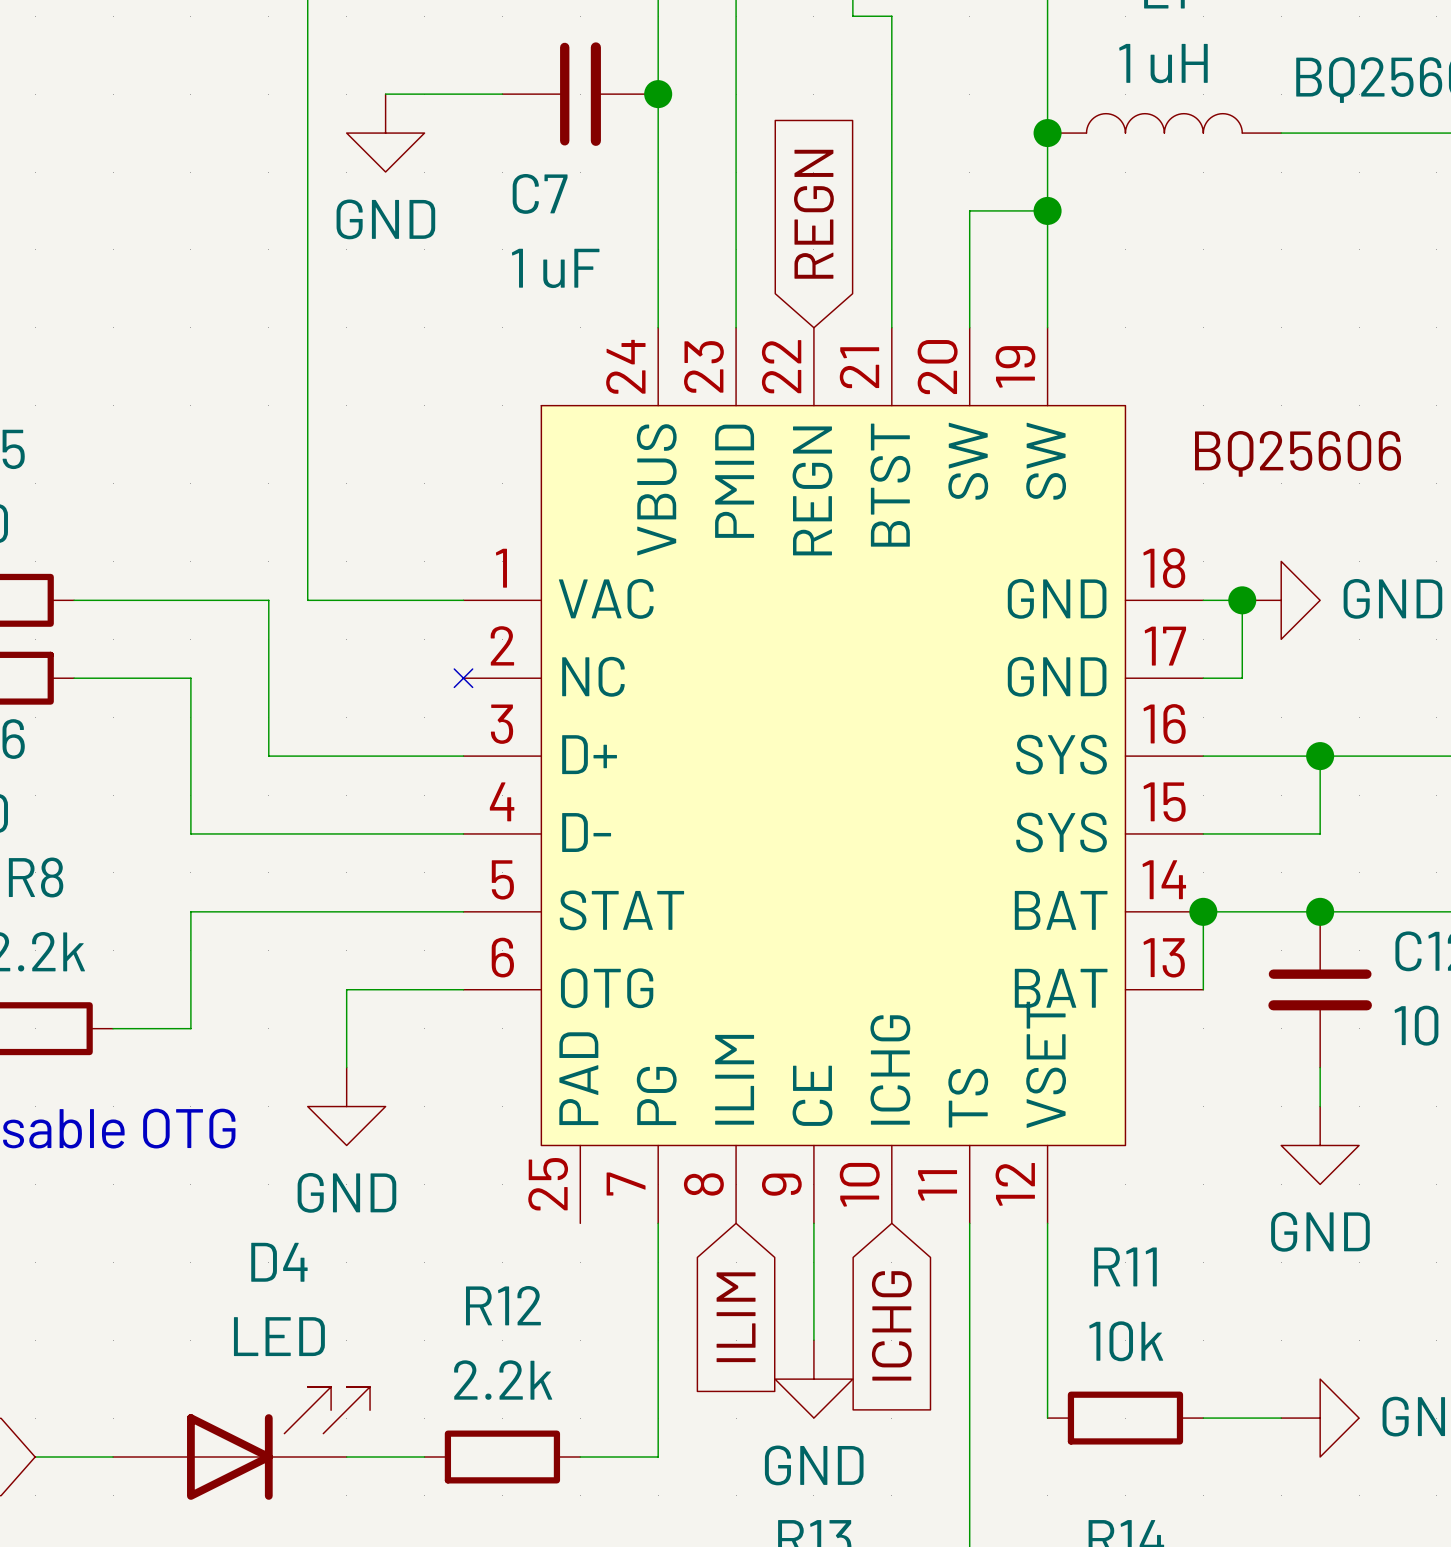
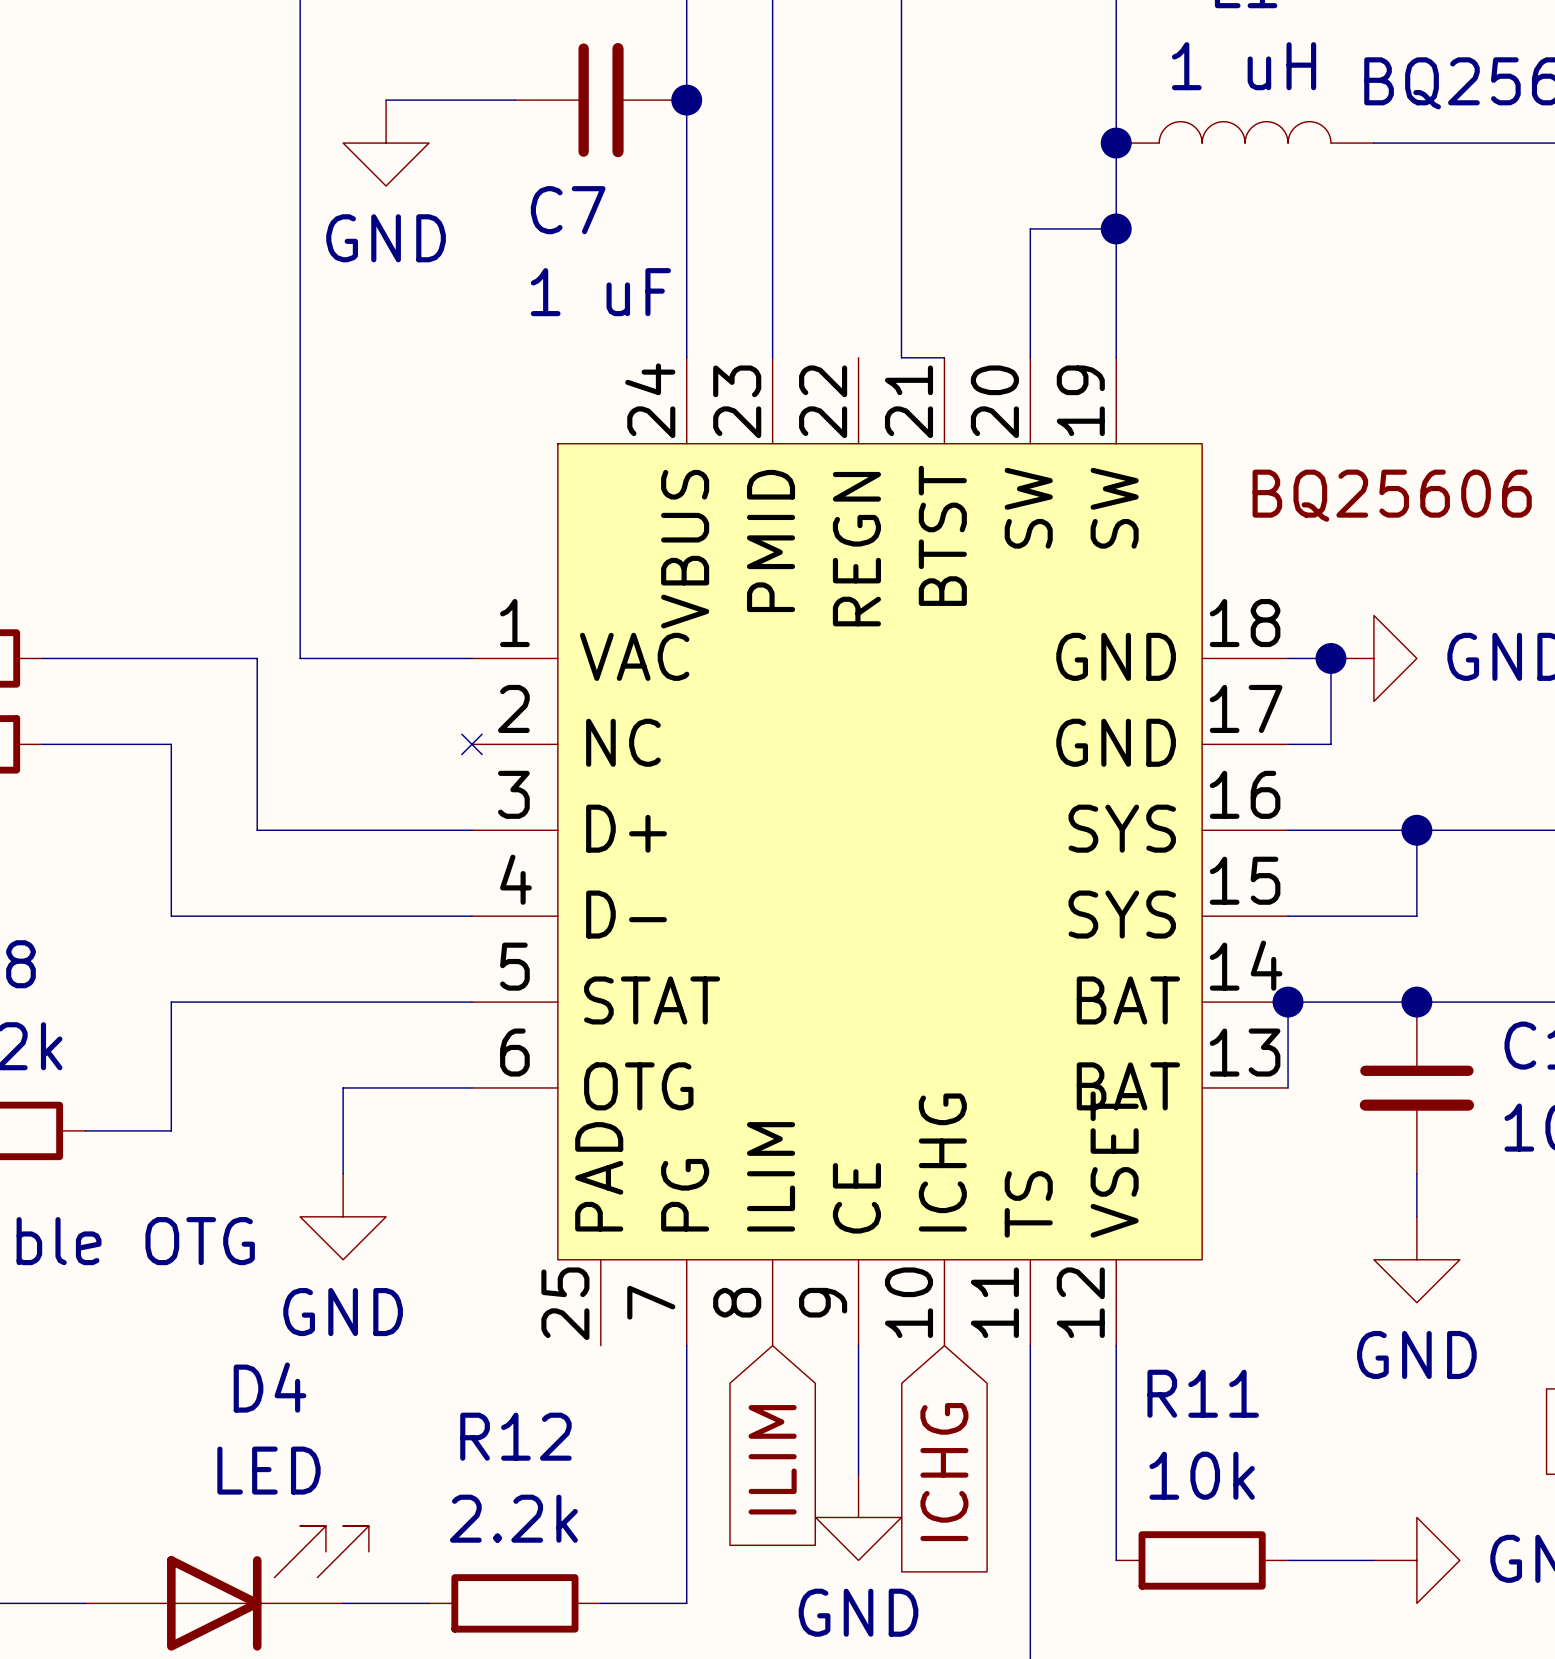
wire: (852, 16) (891, 16) (891, 327) -> (901, 14) (901, 357) (944, 357)
global label: REGN (813, 214) -> none

